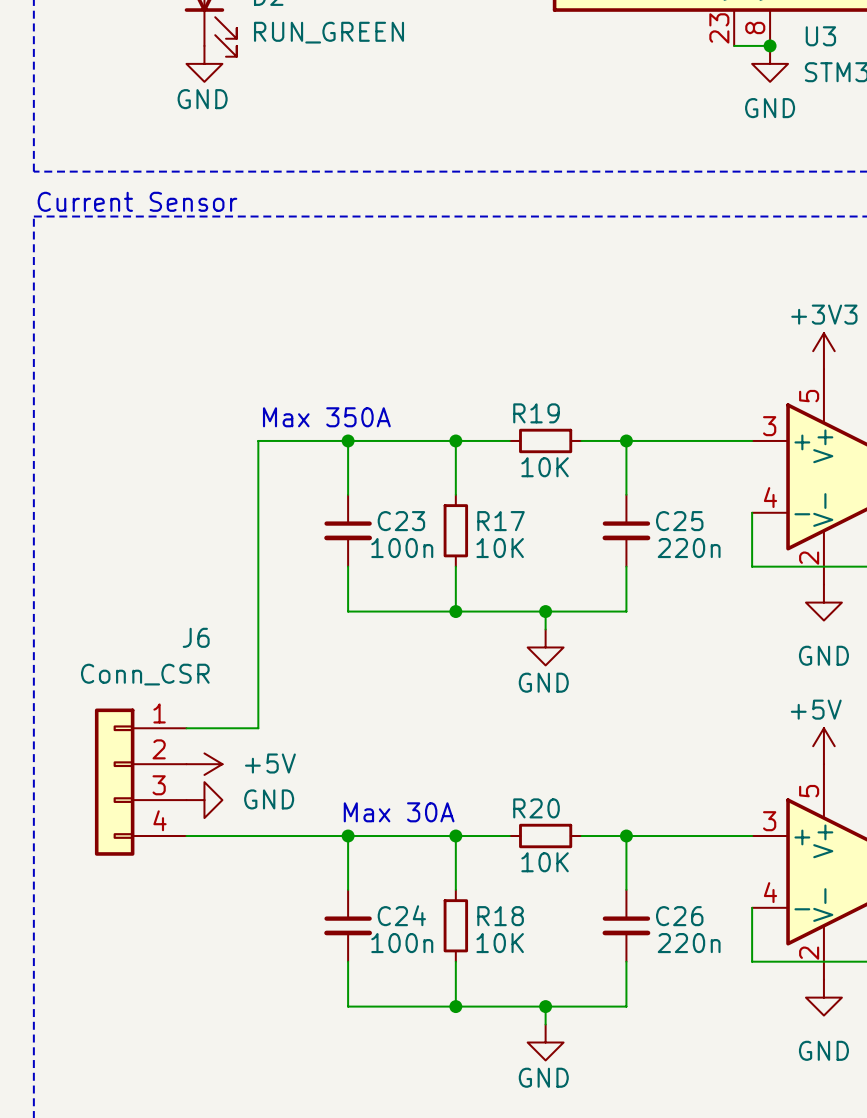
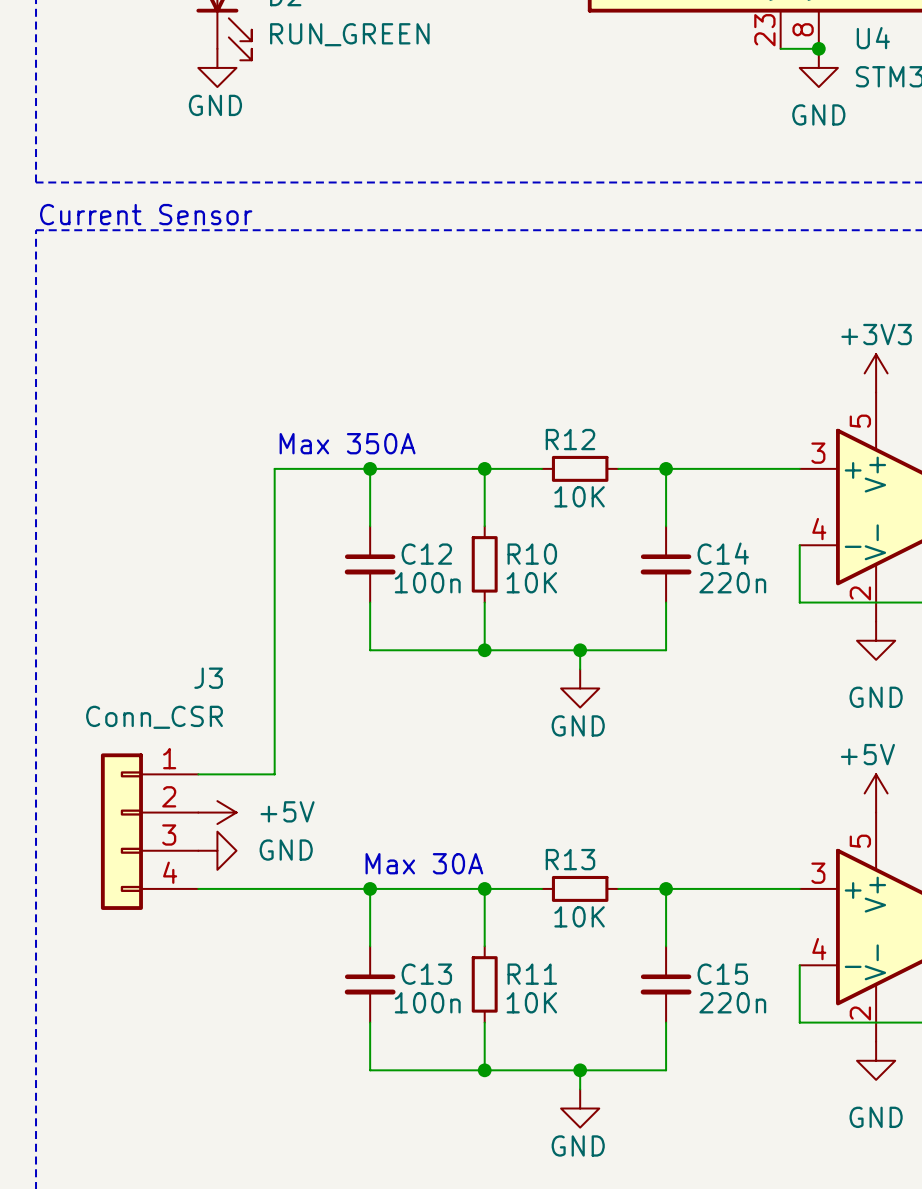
U3 name: U3 (820, 36) -> U4 (873, 38)
R19 name: R19 (536, 413) -> R12 (570, 439)
C23 name: C23 (401, 521) -> C12 (426, 554)
R17 name: R17 (501, 521) -> R10 (532, 554)
C25 name: C25 (679, 521) -> C14 (723, 553)
J6 name: J6 (196, 637) -> J3 (208, 678)
R20 name: R20 (536, 808) -> R13 (570, 859)
C24 name: C24 (401, 915) -> C13 (426, 974)
R18 name: R18 (500, 916) -> R11 (532, 974)
C26 name: C26 (679, 916) -> C15 (722, 974)

